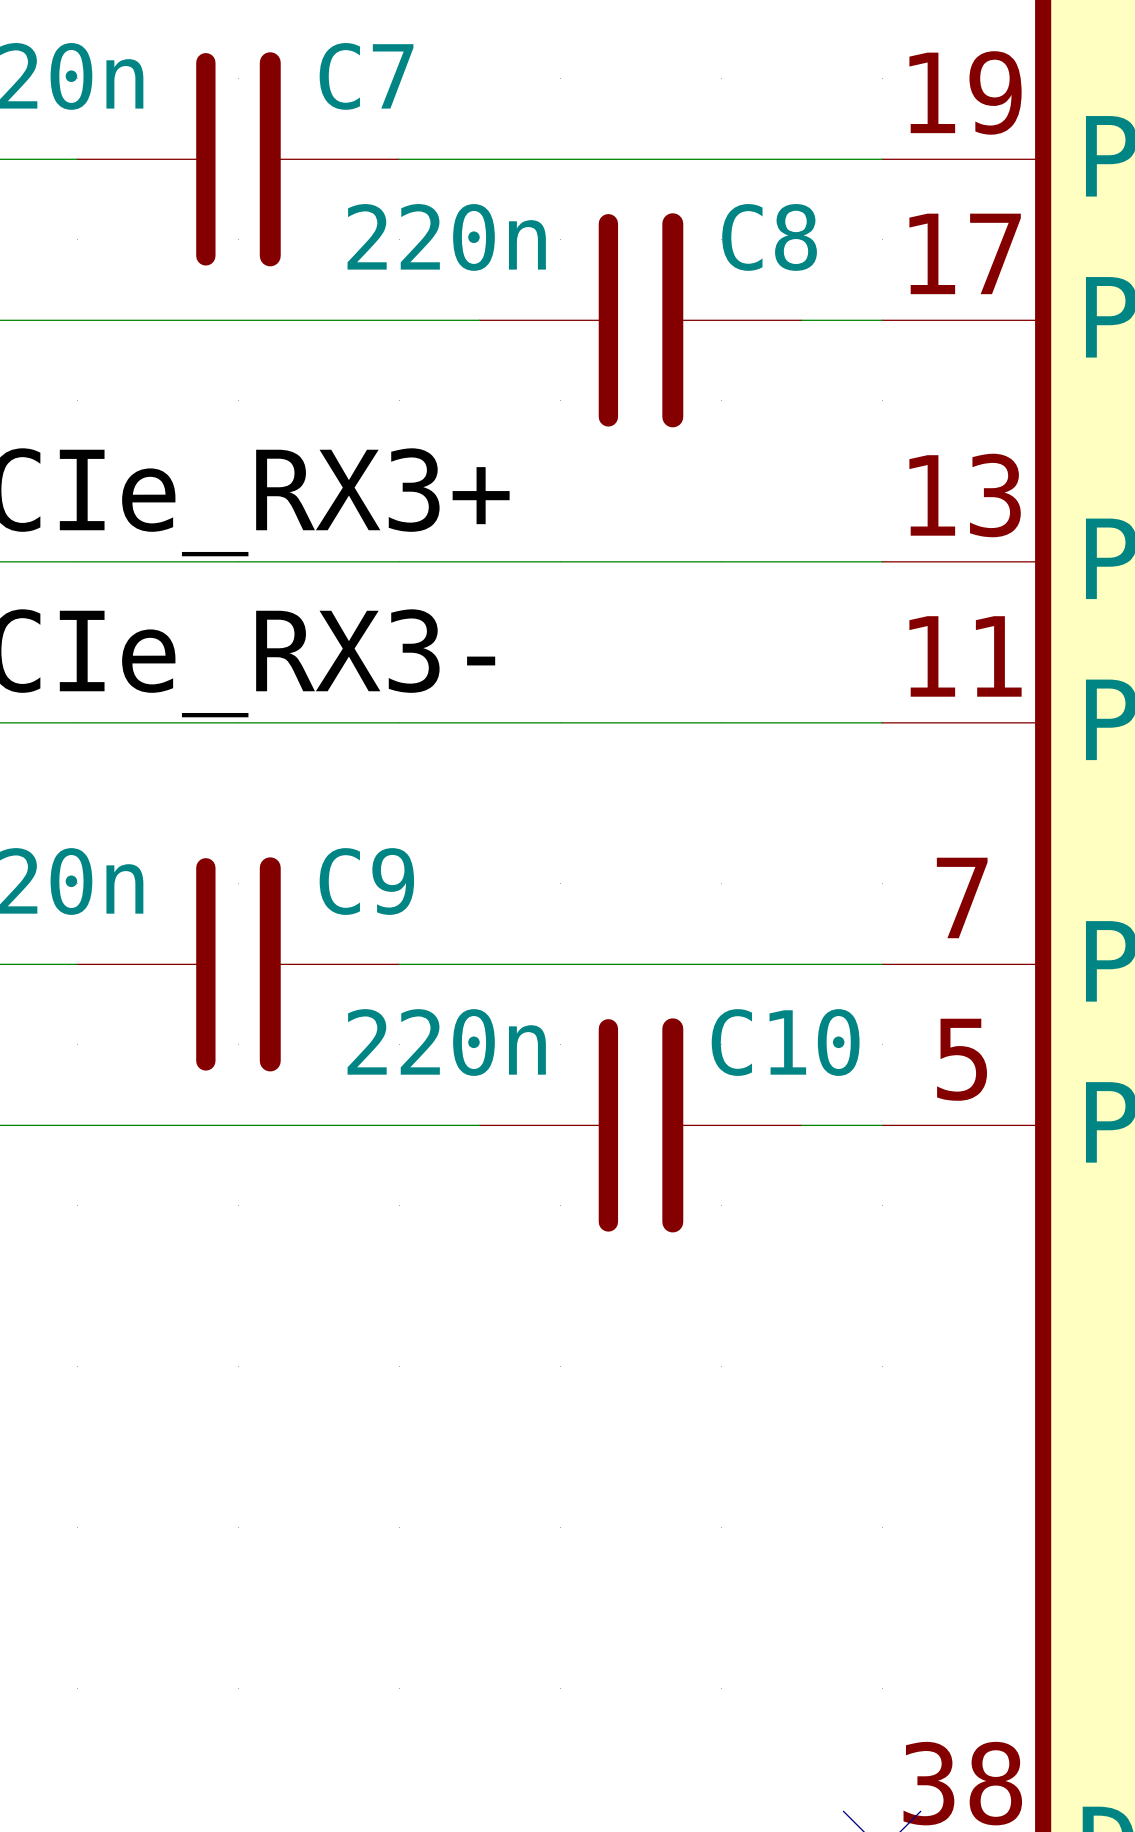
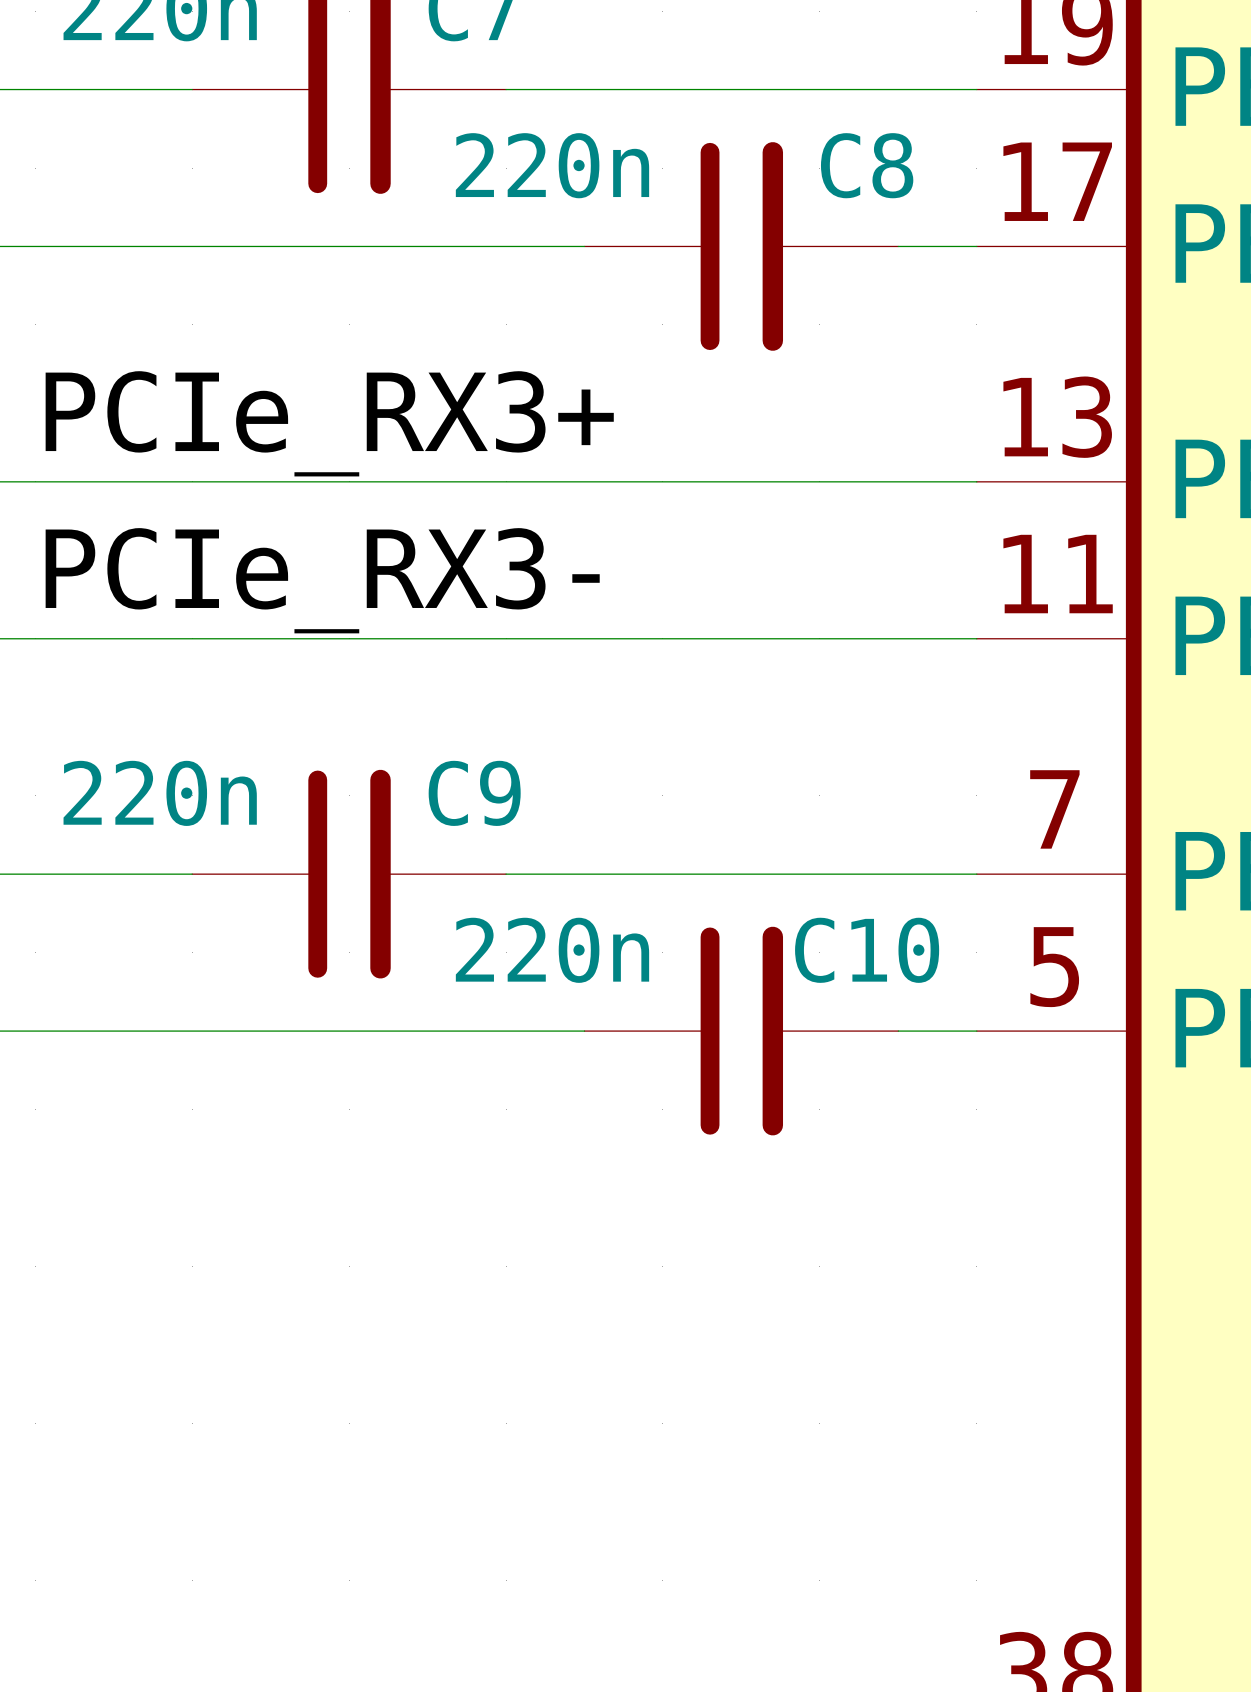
C10 name position: C10 (785, 1042) -> C10 (867, 950)

